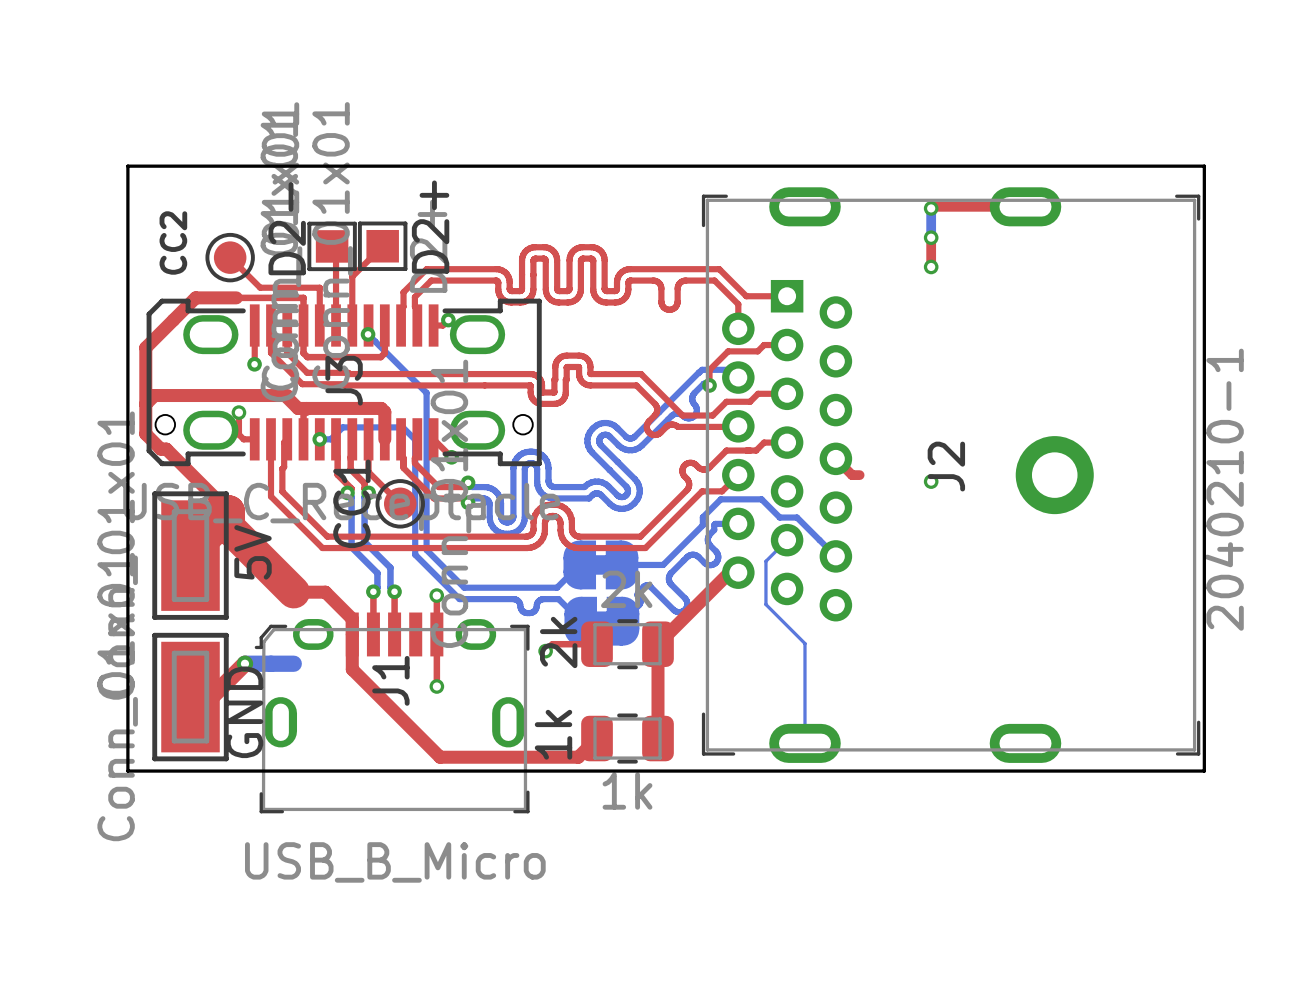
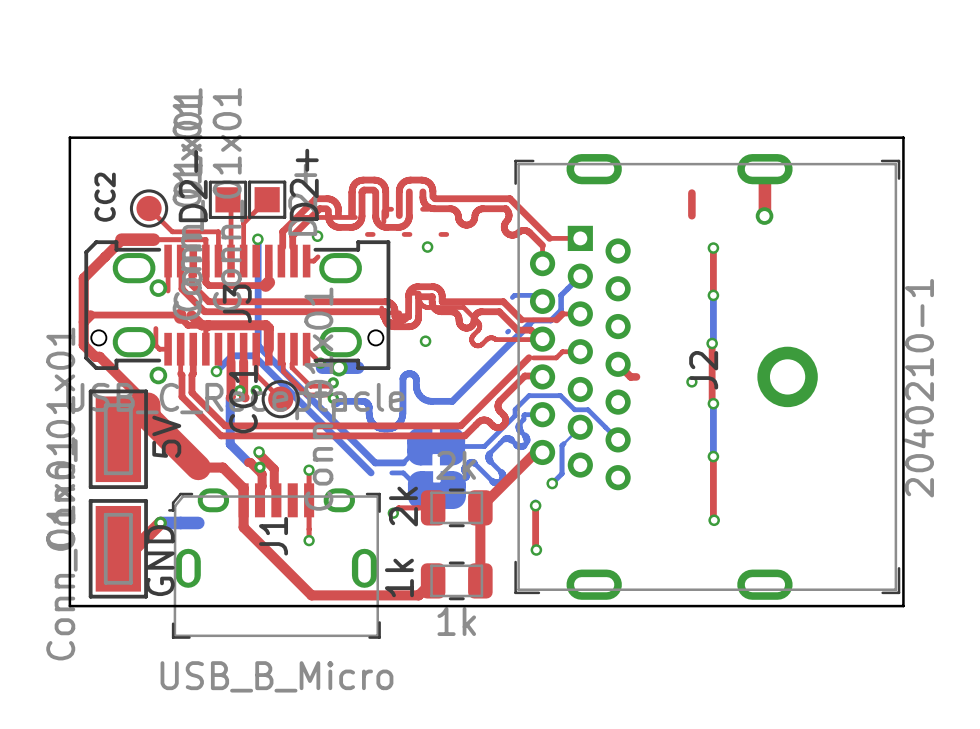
top track: (1025, 206) (932, 206) (931, 208) -> (764, 169) (764, 216)
bottom track: (931, 208) (931, 237) -> none
via: (931, 208) -> none
top track: none -> (373, 190) (363, 190) (362, 191)
top track: none -> (362, 191) (361, 218) (355, 226) (334, 226) (329, 221) (328, 210)
top track: none -> (352, 192) (354, 184) (360, 180) (374, 180) (381, 182) (385, 188) (385, 215)
top track: none -> (375, 191) (375, 218) (379, 224) (386, 227) (400, 227) (406, 223) (409, 216) (409, 191)
via: (931, 237) -> none
top track: none -> (432, 196) (431, 186) (426, 181) (405, 181) (399, 188) (399, 215)
top track: (545, 261) (546, 292) (550, 299) (558, 302) (573, 301) (579, 295) (580, 261) -> none
top track: (593, 261) (593, 292) (600, 301) (615, 302) (623, 299) (628, 292) (628, 282) -> none
via: (931, 266) -> none
via: none -> (764, 216)
top track: (426, 269) (403, 292) (402, 307) -> (338, 215) (338, 207) (334, 201) (329, 199) (315, 198) (282, 231) (282, 247)
top track: (496, 269) (506, 274) (509, 288) -> none
top track: (533, 274) (532, 295) (523, 302) (508, 302) (503, 299) (498, 292) (498, 282) -> none
top track: (495, 280) (431, 280) (414, 297) (415, 307) -> (326, 208) (319, 208) (292, 235) (292, 247)
top track: (630, 280) (658, 282) (661, 286) (661, 303) (667, 309) (673, 309) (676, 305) (678, 285) (685, 280) (714, 280) (738, 305) -> (422, 191) (423, 200) (427, 206) (431, 208) (453, 209) (457, 213) (460, 222) (464, 224) (473, 222) (475, 213) (479, 209) (505, 208) (509, 214) (504, 226) (506, 232) (513, 235) (521, 230) (526, 230) (542, 245)
top track: (522, 288) (522, 257) (526, 250) (535, 247) (549, 248) (555, 254) (557, 288) -> none
top track: (569, 288) (569, 257) (574, 250) (582, 247) (597, 248) (603, 254) (604, 288) -> none
top track: (617, 288) (618, 276) (627, 269) (719, 269) (747, 296) -> (434, 198) (509, 198) (549, 238)
via: none -> (317, 236)
top track width: thin (194, 297) (236, 297) -> thick (121, 239) (153, 239)
via: none -> (257, 239)
via: none -> (427, 247)
top track: none -> (713, 248) (713, 295)
via: none -> (713, 248)
via: (448, 320) -> none
top track width: thin (303, 325) (303, 353) (307, 357) (380, 357) (384, 353) (384, 325) -> thick (205, 261) (205, 282) (208, 285) (265, 285) (268, 282) (268, 261)
bottom track: (368, 334) (426, 392) (426, 549) (464, 587) (556, 587) (558, 586) -> (258, 239) (258, 345) (375, 462) (403, 462)
via: (368, 334) -> none
top track: (270, 341) (270, 352) (302, 384) (529, 385) -> (180, 273) (181, 289) (204, 311) (385, 311) (385, 321) (390, 325) (409, 326) (415, 324) (418, 319) (418, 296) (432, 296) (432, 304) (435, 309) (456, 313) (459, 323) (463, 327) (471, 326) (474, 316) (478, 312) (499, 311) (517, 330) (531, 330) (540, 339)
top track: (287, 341) (287, 352) (307, 372) (530, 374) (539, 378) (542, 391) -> (193, 273) (191, 284) (208, 301) (385, 301) (394, 307) (394, 316) (408, 316) (408, 296) (410, 290) (415, 286) (432, 286) (441, 292) (442, 301) (503, 301) (521, 319) (556, 319) (562, 313)
top track: (787, 345) (764, 345) (757, 351) (728, 351) (709, 370) (709, 385) -> none
bottom track: none -> (580, 276) (561, 295) (561, 310) (550, 320) (533, 320) (452, 401) (425, 399) (417, 392) (415, 376) (410, 373) (405, 375) (402, 378) (402, 413)
via size: [247, 356, 262, 372] -> [149, 279, 168, 297]
bottom track: none -> (713, 295) (712, 343)
via: none -> (713, 295)
bottom track: (698, 372) (633, 437) (627, 437) (614, 425) (607, 423) (596, 425) (589, 432) (587, 439) (589, 449) (627, 487) (627, 492) (623, 496) (618, 496) (605, 484) (598, 481) (591, 482) (584, 487) (552, 486) (548, 482) (546, 461) (539, 453) (531, 451) (519, 455) (513, 464) (513, 516) (509, 521) (504, 521) (501, 518) (500, 499) (494, 490) (488, 487) (472, 487) (468, 482) -> none
top track: (590, 373) (589, 362) (584, 356) (561, 356) (555, 364) (554, 391) -> none
top track: (591, 374) (641, 374) (682, 415) (712, 415) (726, 401) (750, 401) (758, 393) (764, 393) -> none
bottom track: (709, 385) (703, 383) (693, 394) (692, 401) (696, 409) (694, 415) -> none
via: (709, 385) -> none
top track: (154, 395) (287, 395) -> (90, 315) (180, 315) (180, 317) (188, 325) (201, 325)
via: (238, 412) -> none
bottom track: (693, 417) (687, 418) (680, 414) (672, 414) (642, 445) (632, 450) (621, 447) (607, 435) (600, 437) (600, 445) (638, 485) (639, 492) (637, 499) (627, 507) (619, 508) (613, 506) (597, 493) (589, 498) (546, 496) (538, 489) (537, 467) (530, 463) (524, 467) (524, 517) (523, 524) (518, 530) (508, 533) (495, 530) (490, 520) (489, 503) (486, 499) (472, 498) (468, 502) -> none
via: none -> (425, 341)
top track: none -> (712, 343) (713, 403)
via: none -> (712, 343)
top track: (287, 439) (284, 442) (282, 491) (327, 536) (527, 536) (532, 532) (533, 518) (537, 511) (543, 506) (551, 504) (561, 506) (568, 511) (571, 518) (572, 530) (576, 535) (640, 536) (687, 488) (688, 481) (682, 471) (684, 465) (691, 462) (701, 469) (706, 469) (726, 450) -> (193, 349) (191, 392) (225, 425) (460, 425) (528, 357)
bottom track: (319, 439) (330, 439) (342, 427) (402, 427) (415, 439) (415, 554) (459, 599) (514, 599) (519, 603) (521, 610) (527, 613) (534, 611) (538, 601) (543, 599) -> none
via: (319, 439) -> none
top track: (336, 455) (337, 474) (351, 488) (347, 492) -> (231, 361) (230, 397)
top track: (352, 455) (350, 469) (364, 483) (364, 488) (368, 492) -> (243, 361) (245, 397)
bottom track: none -> (322, 367) (358, 367)
via: none -> (338, 367)
bottom track: none -> (216, 371) (232, 355) (254, 355) (371, 472)
via: none -> (216, 371)
top track: (270, 471) (270, 496) (322, 548) (531, 547) (541, 541) (544, 534) (545, 520) (552, 515) -> (180, 373) (181, 396) (221, 435) (464, 435) (481, 420) (488, 421) (495, 427) (502, 426) (505, 419) (498, 408) (500, 400) (524, 376) (542, 376)
via: none -> (158, 375)
top track: (738, 475) (722, 491) (702, 491) (645, 548) (574, 547) (564, 541) (560, 534) (559, 520) (553, 515) -> none
bottom track: (347, 492) (351, 496) (351, 547) (377, 573) (377, 587) (373, 591) -> none
bottom track: (368, 492) (364, 496) (364, 541) (390, 567) (390, 587) (394, 591) -> none
bottom track: none -> (230, 397) (230, 444) (248, 462)
bottom track: none -> (336, 403) (339, 401) (365, 402) (369, 406) (370, 420) (374, 425) (381, 428) (390, 428) (396, 425) (401, 420) (402, 413)
bottom track: none -> (713, 403) (713, 456)
via: none -> (713, 403)
bottom track: (765, 561) (765, 604) (804, 643) (804, 743) -> (563, 443) (562, 445) (562, 473) (552, 483)
via: none -> (259, 452)
top track: none -> (713, 456) (714, 520)
via: none -> (713, 456)
top track: (373, 591) (373, 619) -> (248, 462) (262, 474) (262, 486) (260, 488)
top track: (394, 591) (394, 619) -> (259, 452) (274, 469) (274, 486) (276, 488)
via: (394, 591) -> none
via: none -> (552, 483)
top track: none -> (535, 505) (536, 550)
via: none -> (535, 505)
via: none -> (714, 520)
via: none -> (536, 550)

